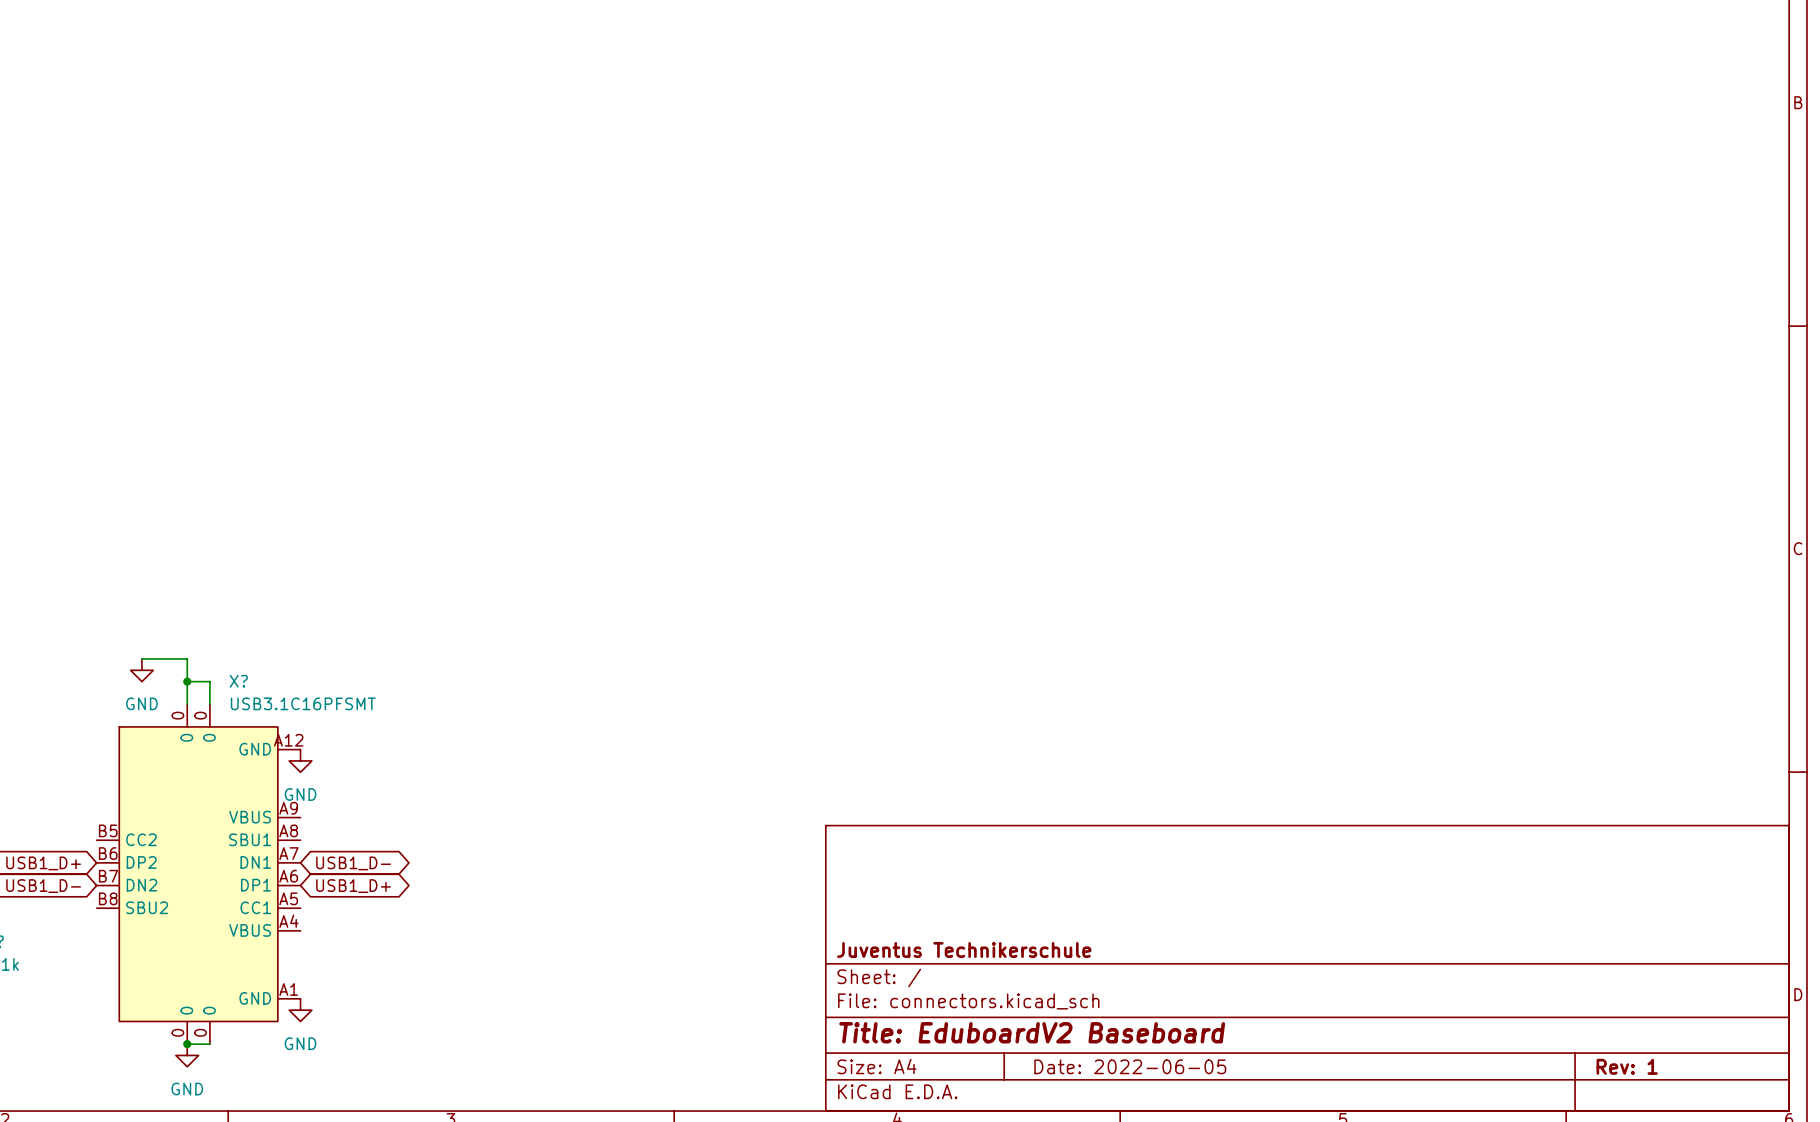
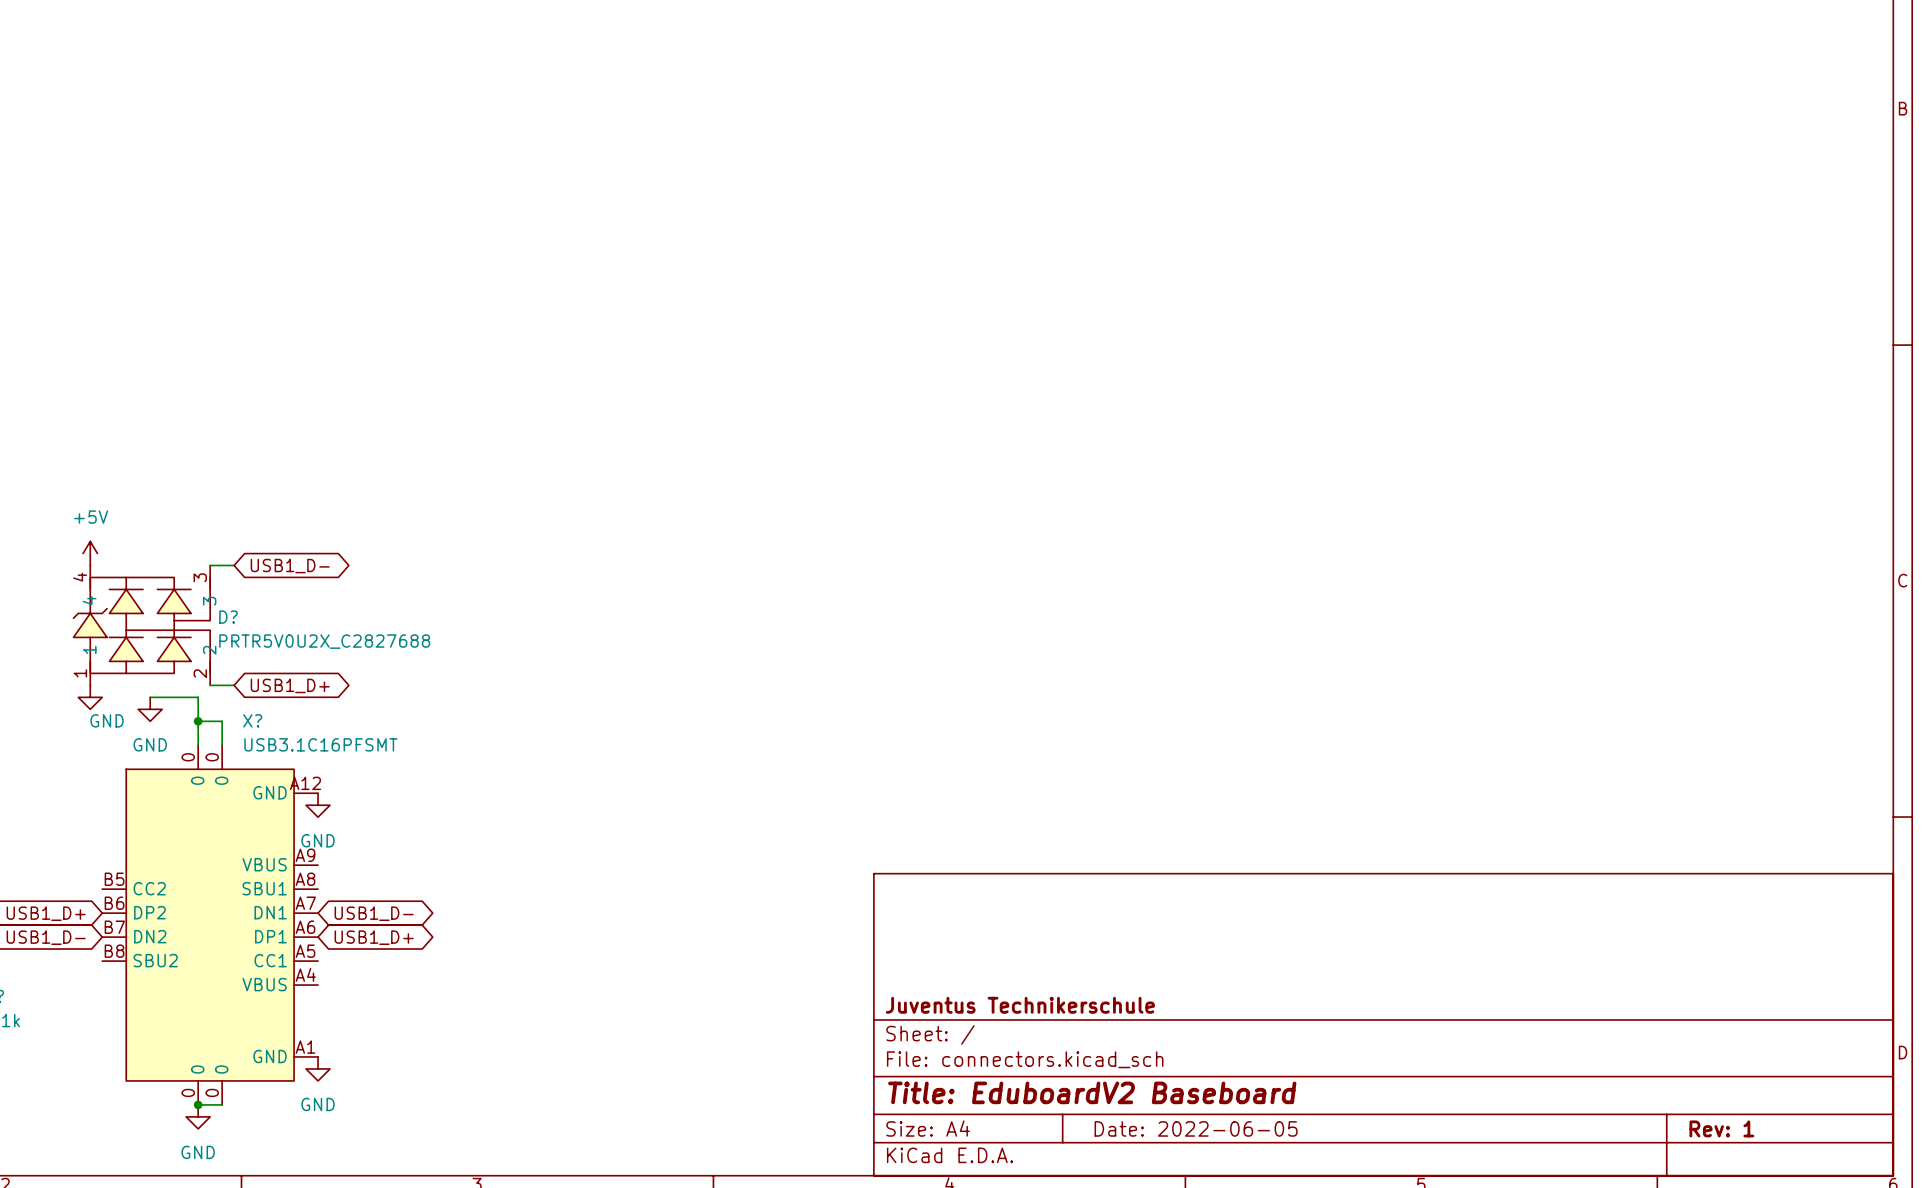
power symbol: none -> +5V (90, 553)
wire: none -> (210, 565) (234, 565)
global label: none -> USB1_D- (290, 566)
D?: none -> PRTR5V0U2X_C2827688 (141, 625)
wire: none -> (210, 685) (234, 685)
global label: none -> USB1_D+ (290, 685)
power symbol: none -> GND (90, 697)

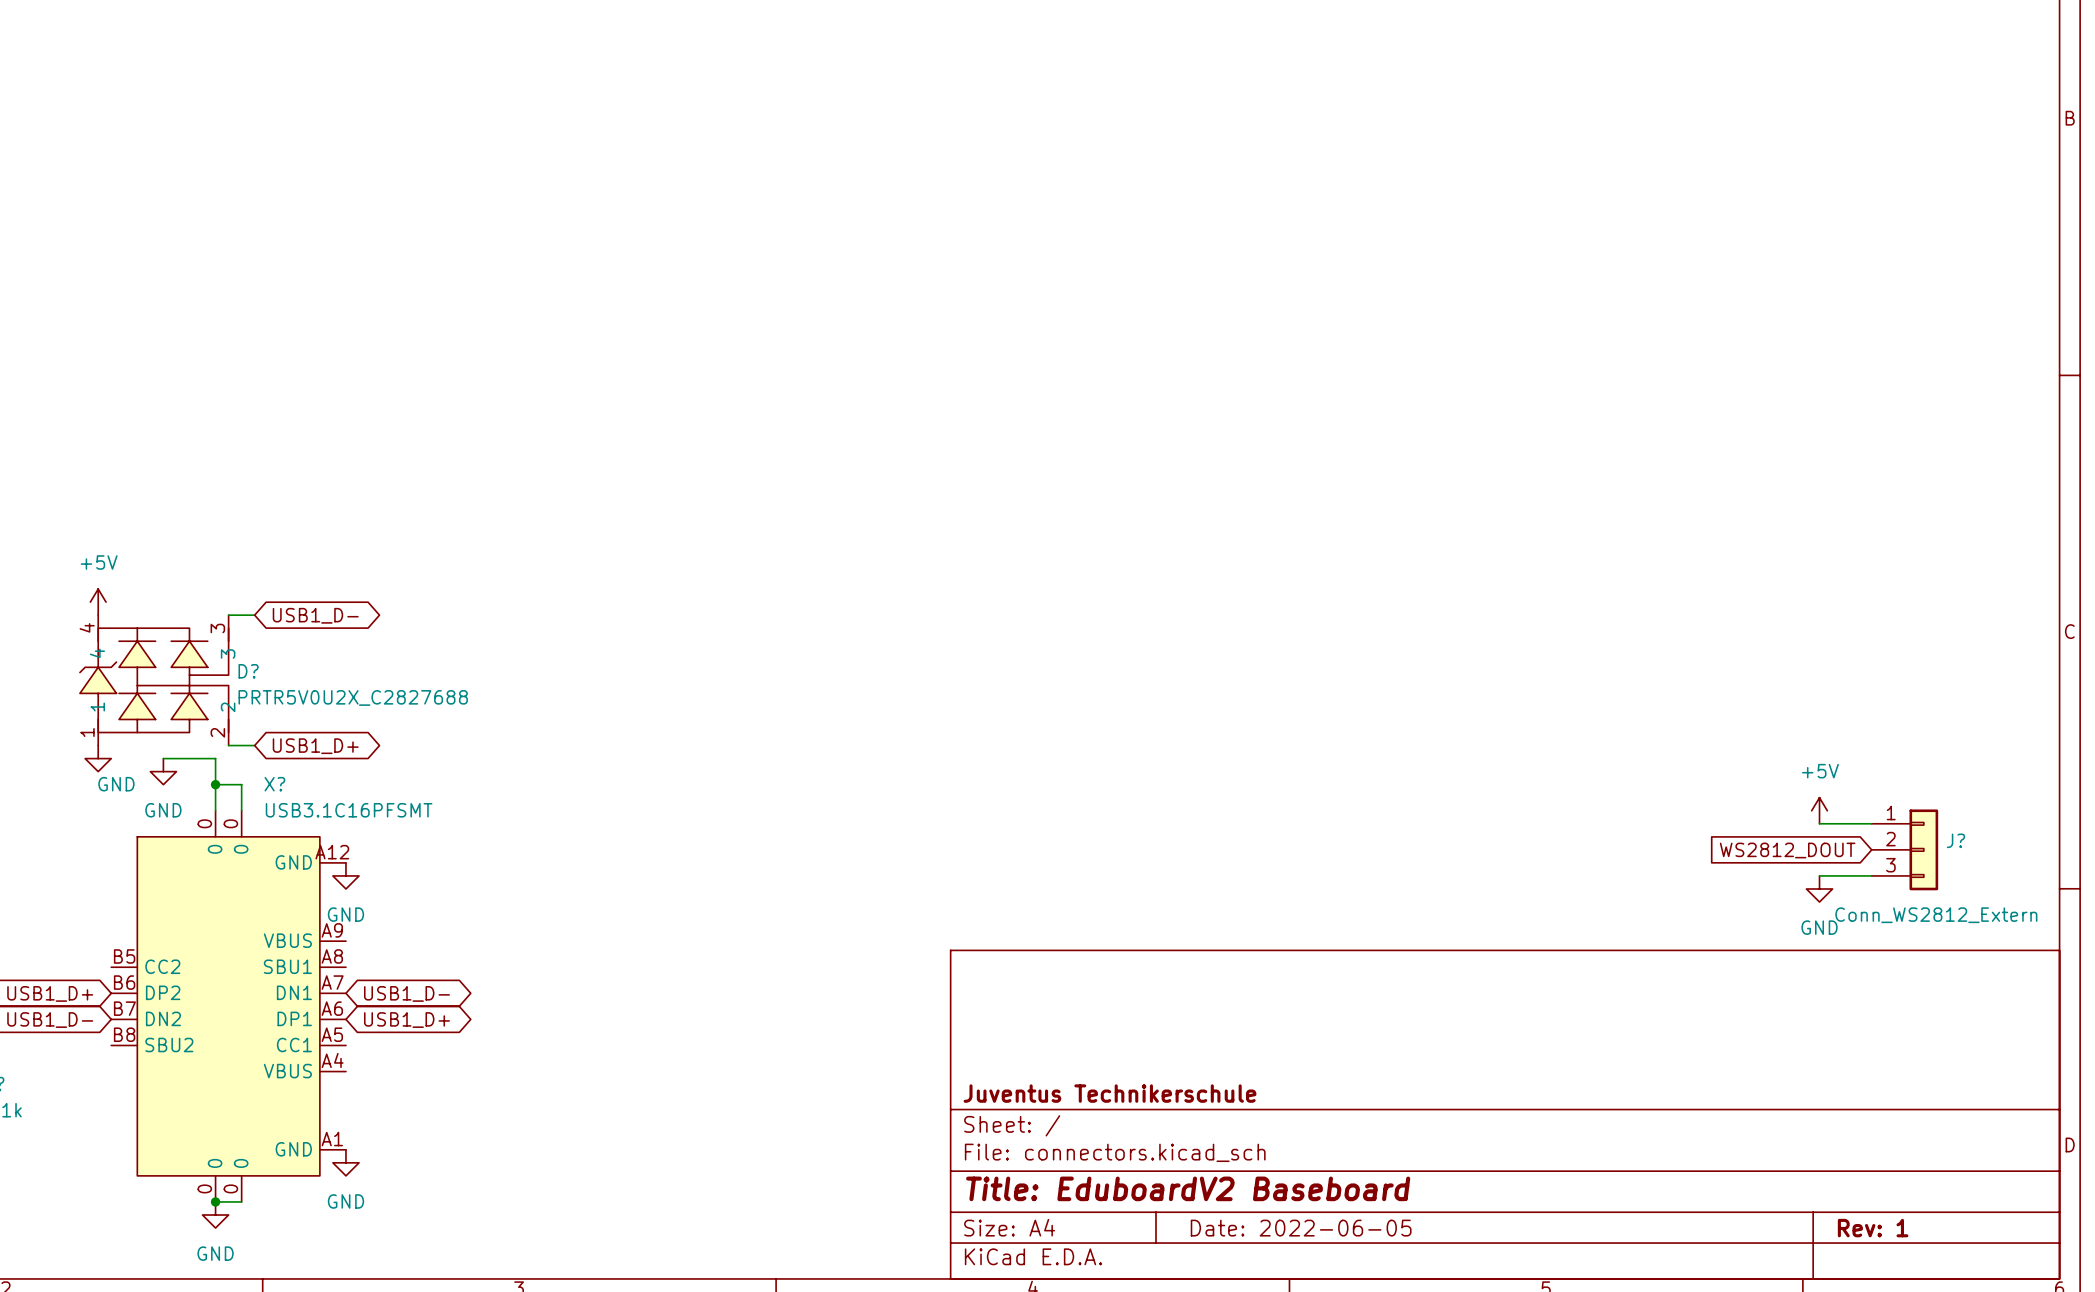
power symbol: none -> +5V (1819, 810)
wire: none -> (1819, 823) (1871, 823)
global label: none -> WS2812_DOUT (1787, 850)
J?: none -> Conn_WS2812_Extern (1904, 849)
wire: none -> (1819, 875) (1871, 875)
power symbol: none -> GND (1819, 889)

